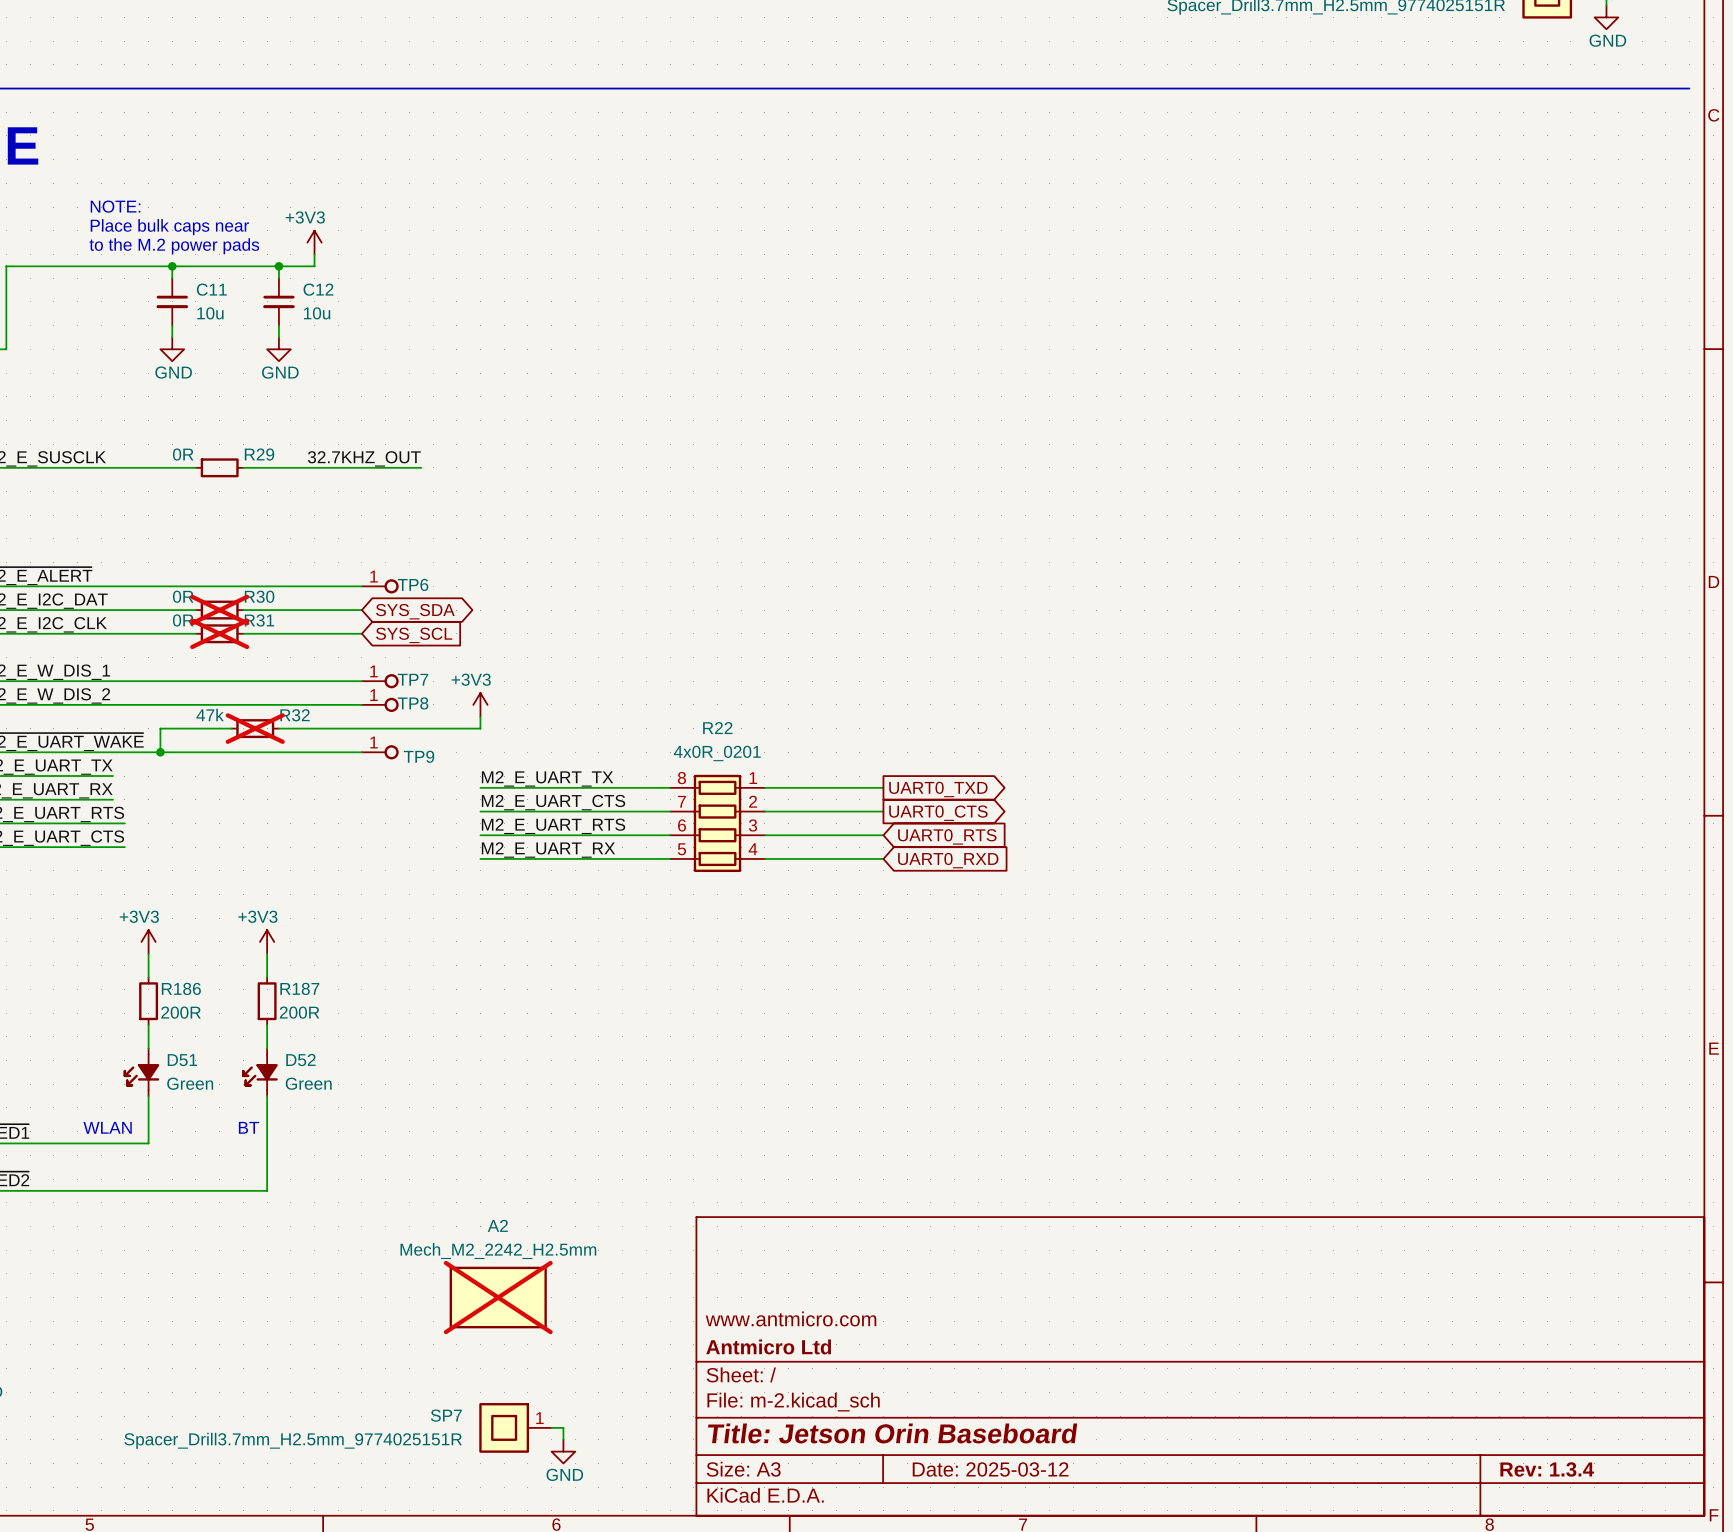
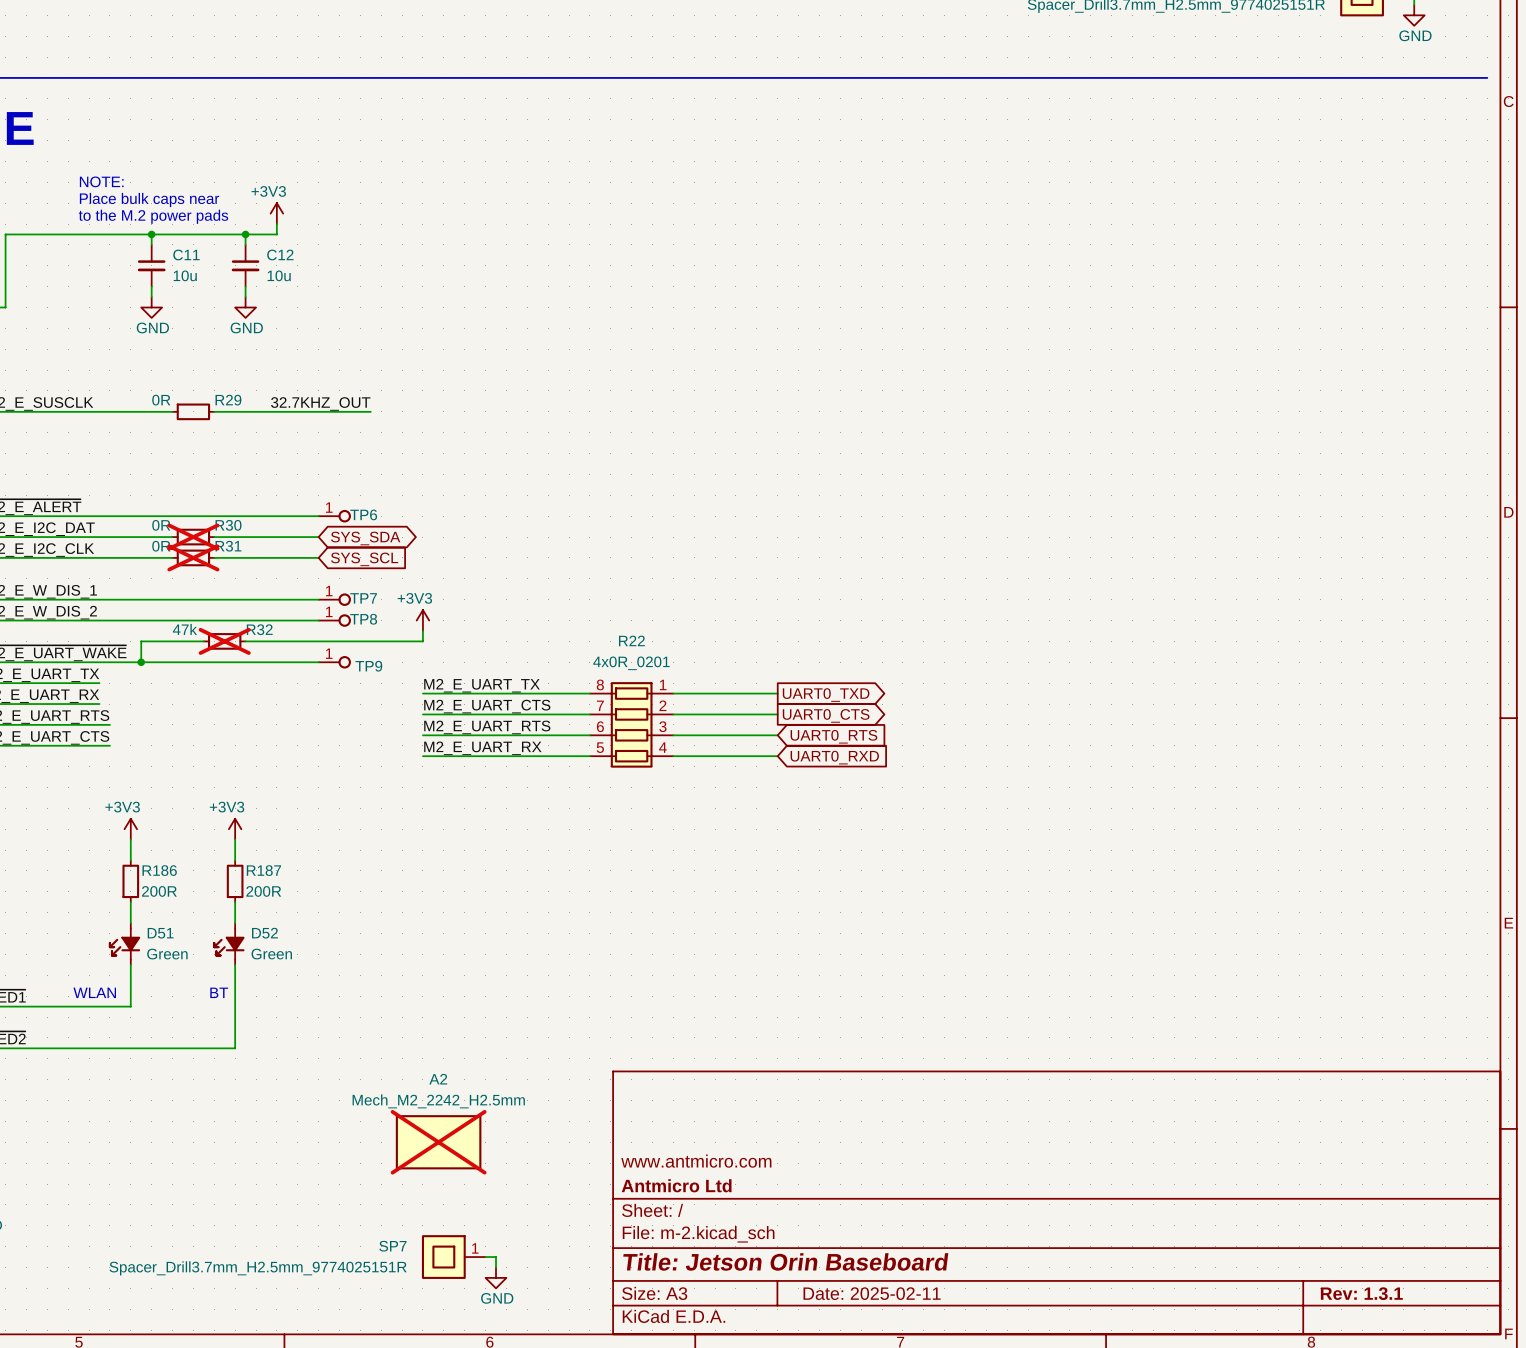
title block: Date: 2025-03-12 (990, 1469) -> Date: 2025-02-11 (872, 1293)
title block: Rev: 1.3.4 (1547, 1469) -> Rev: 1.3.1 (1361, 1293)

